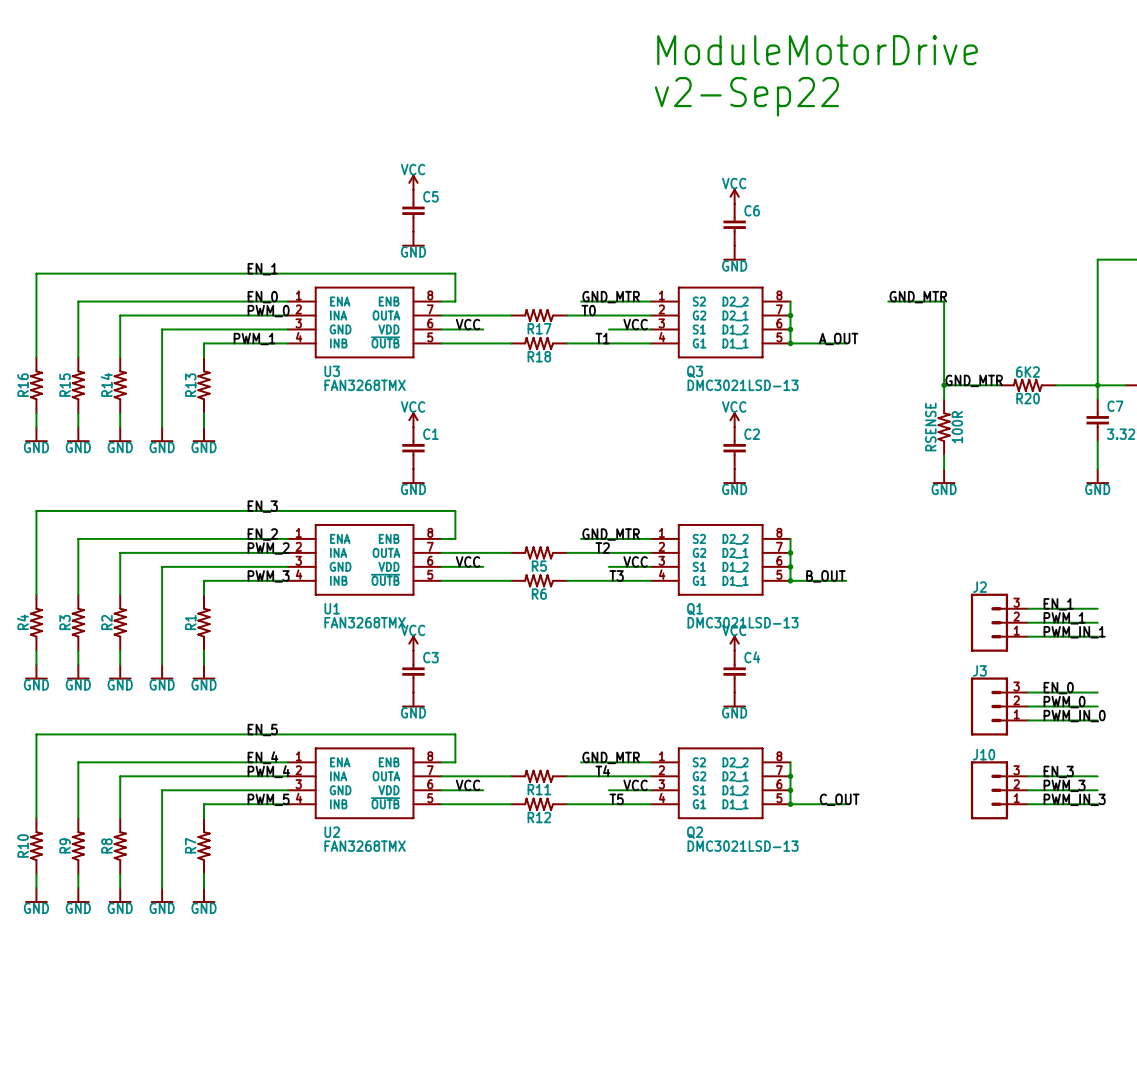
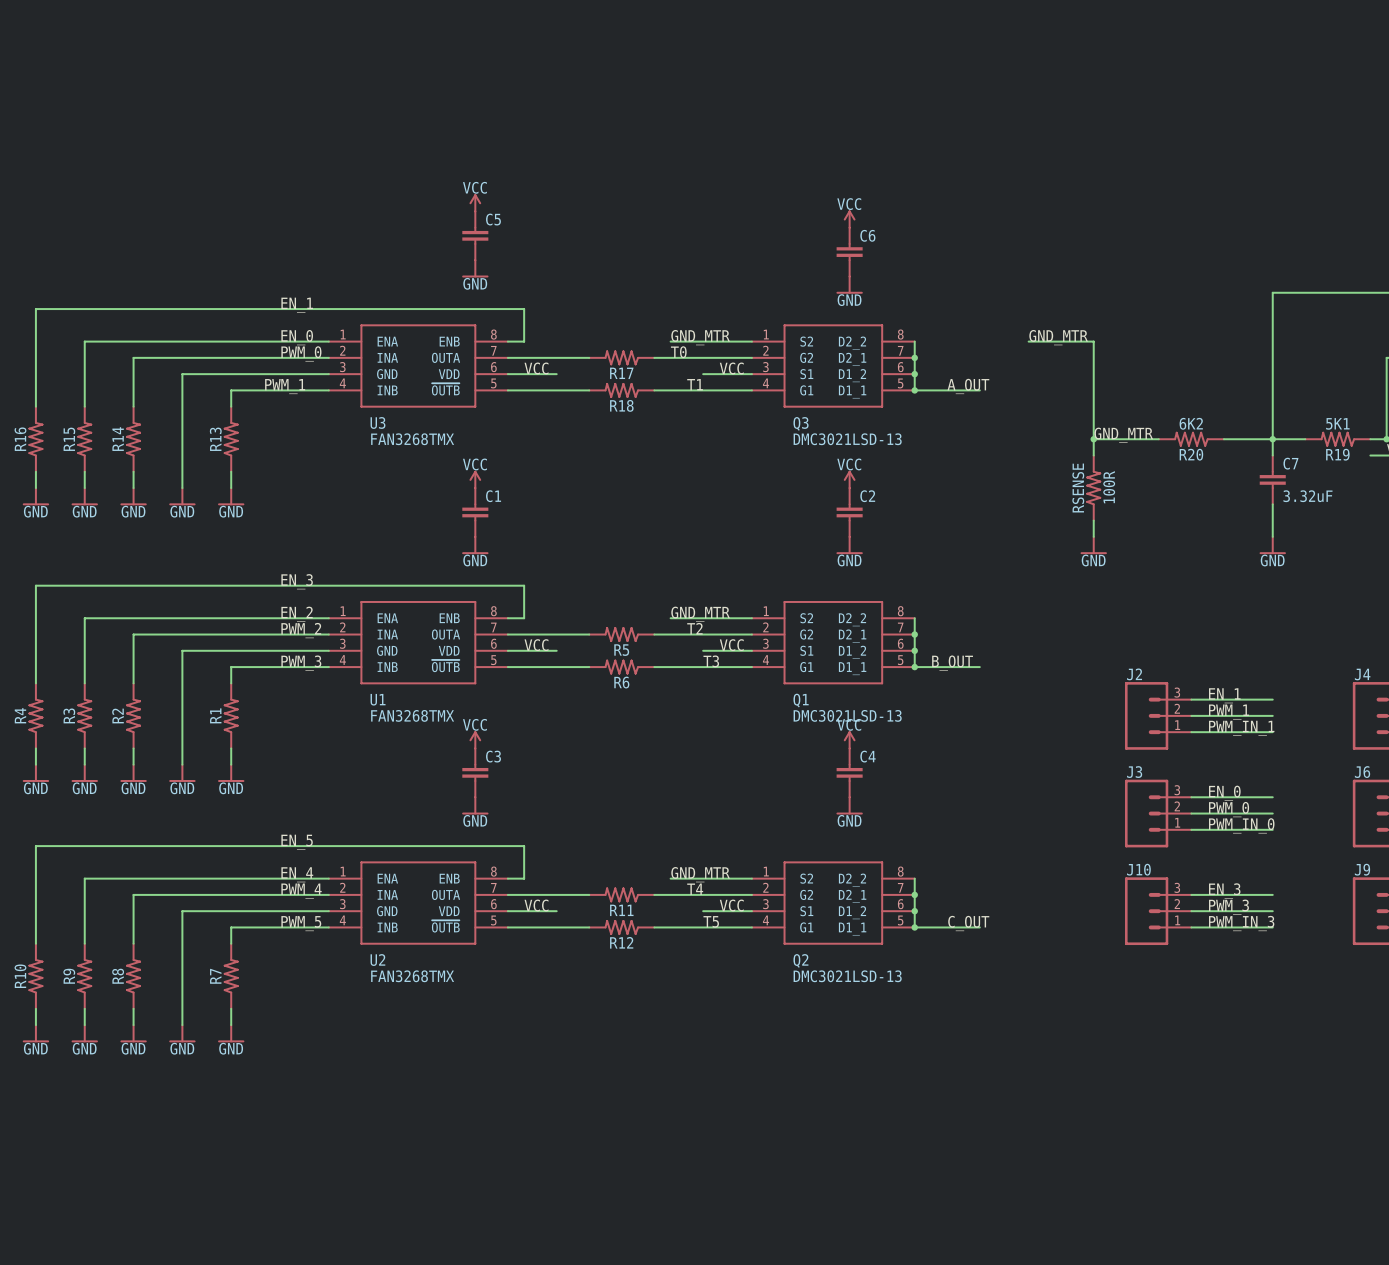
text: ModuleMotorDrive (817, 50) -> none
text: v2-Sep22 (746, 96) -> none

